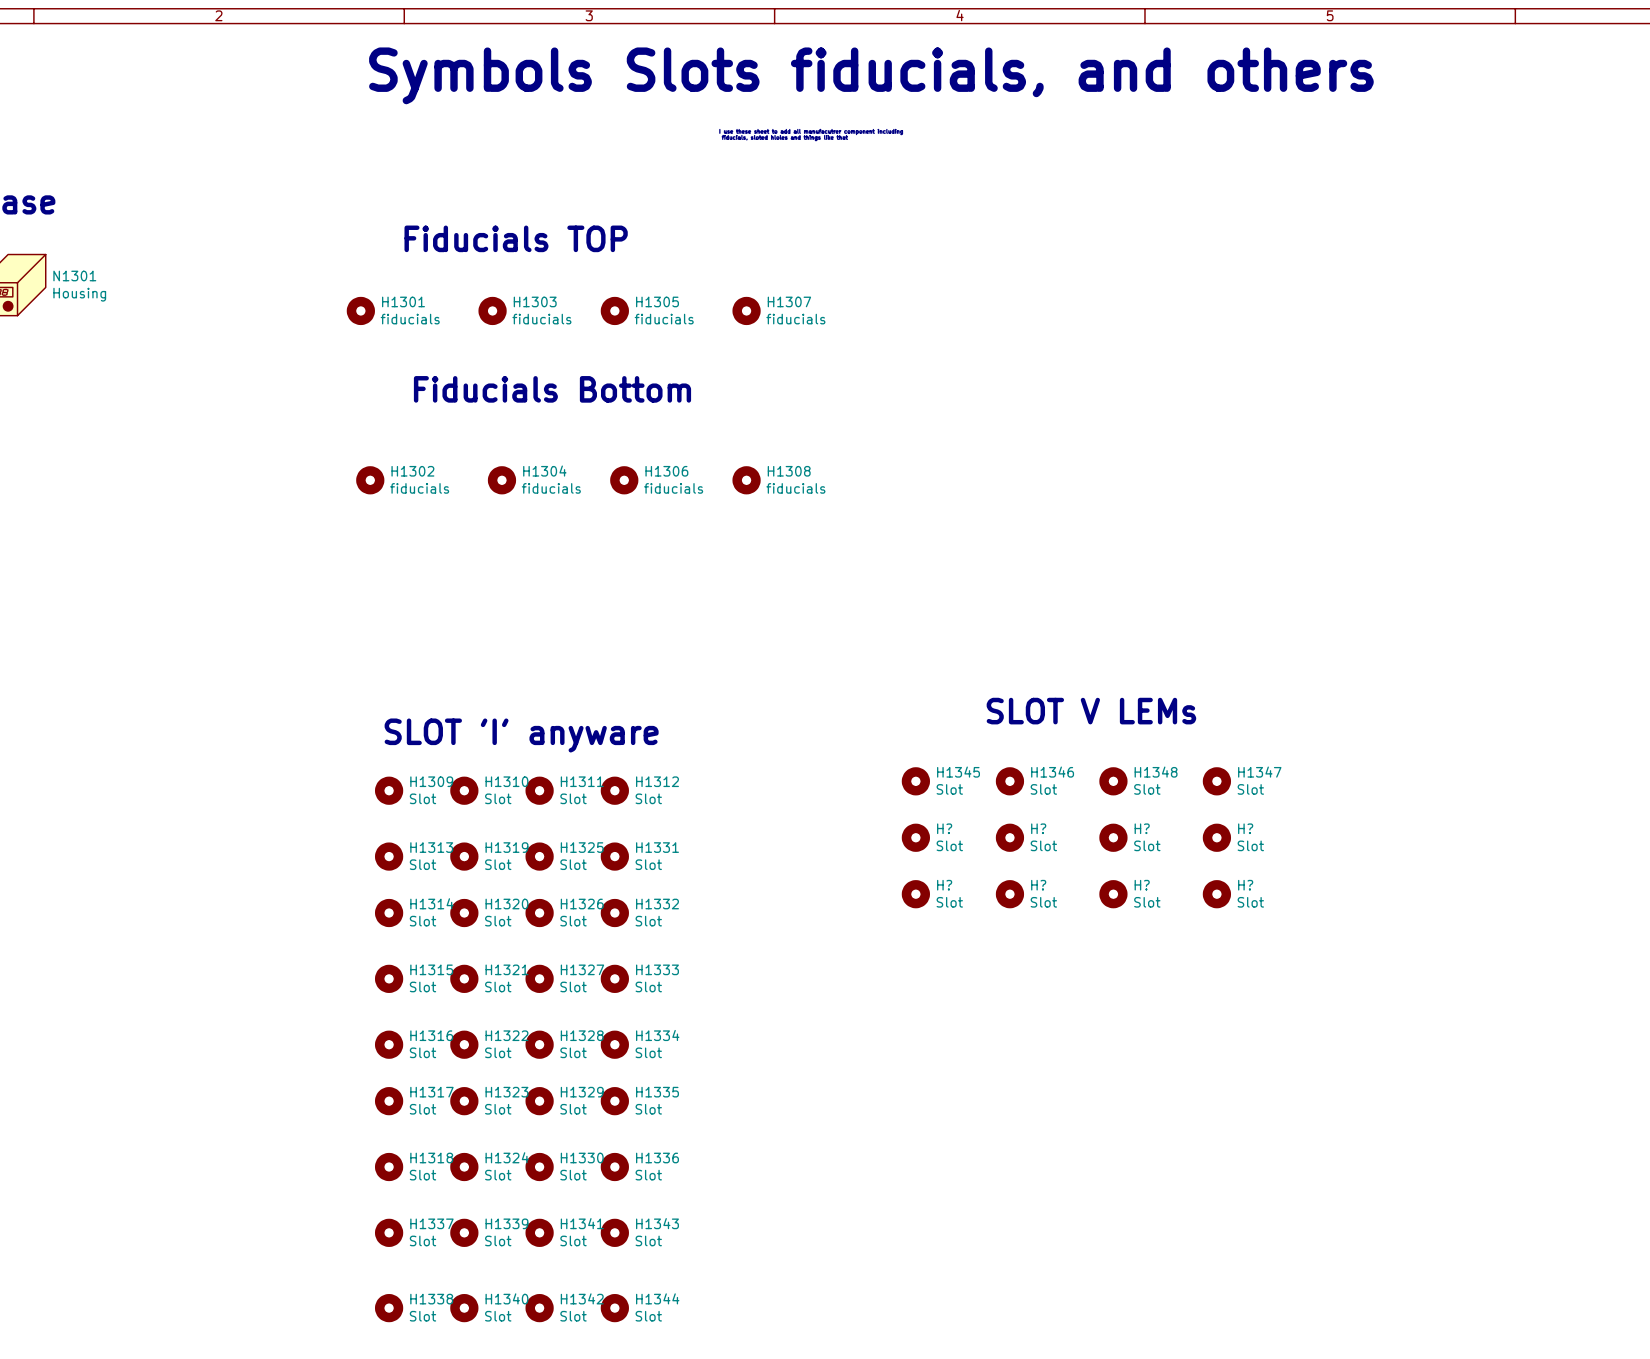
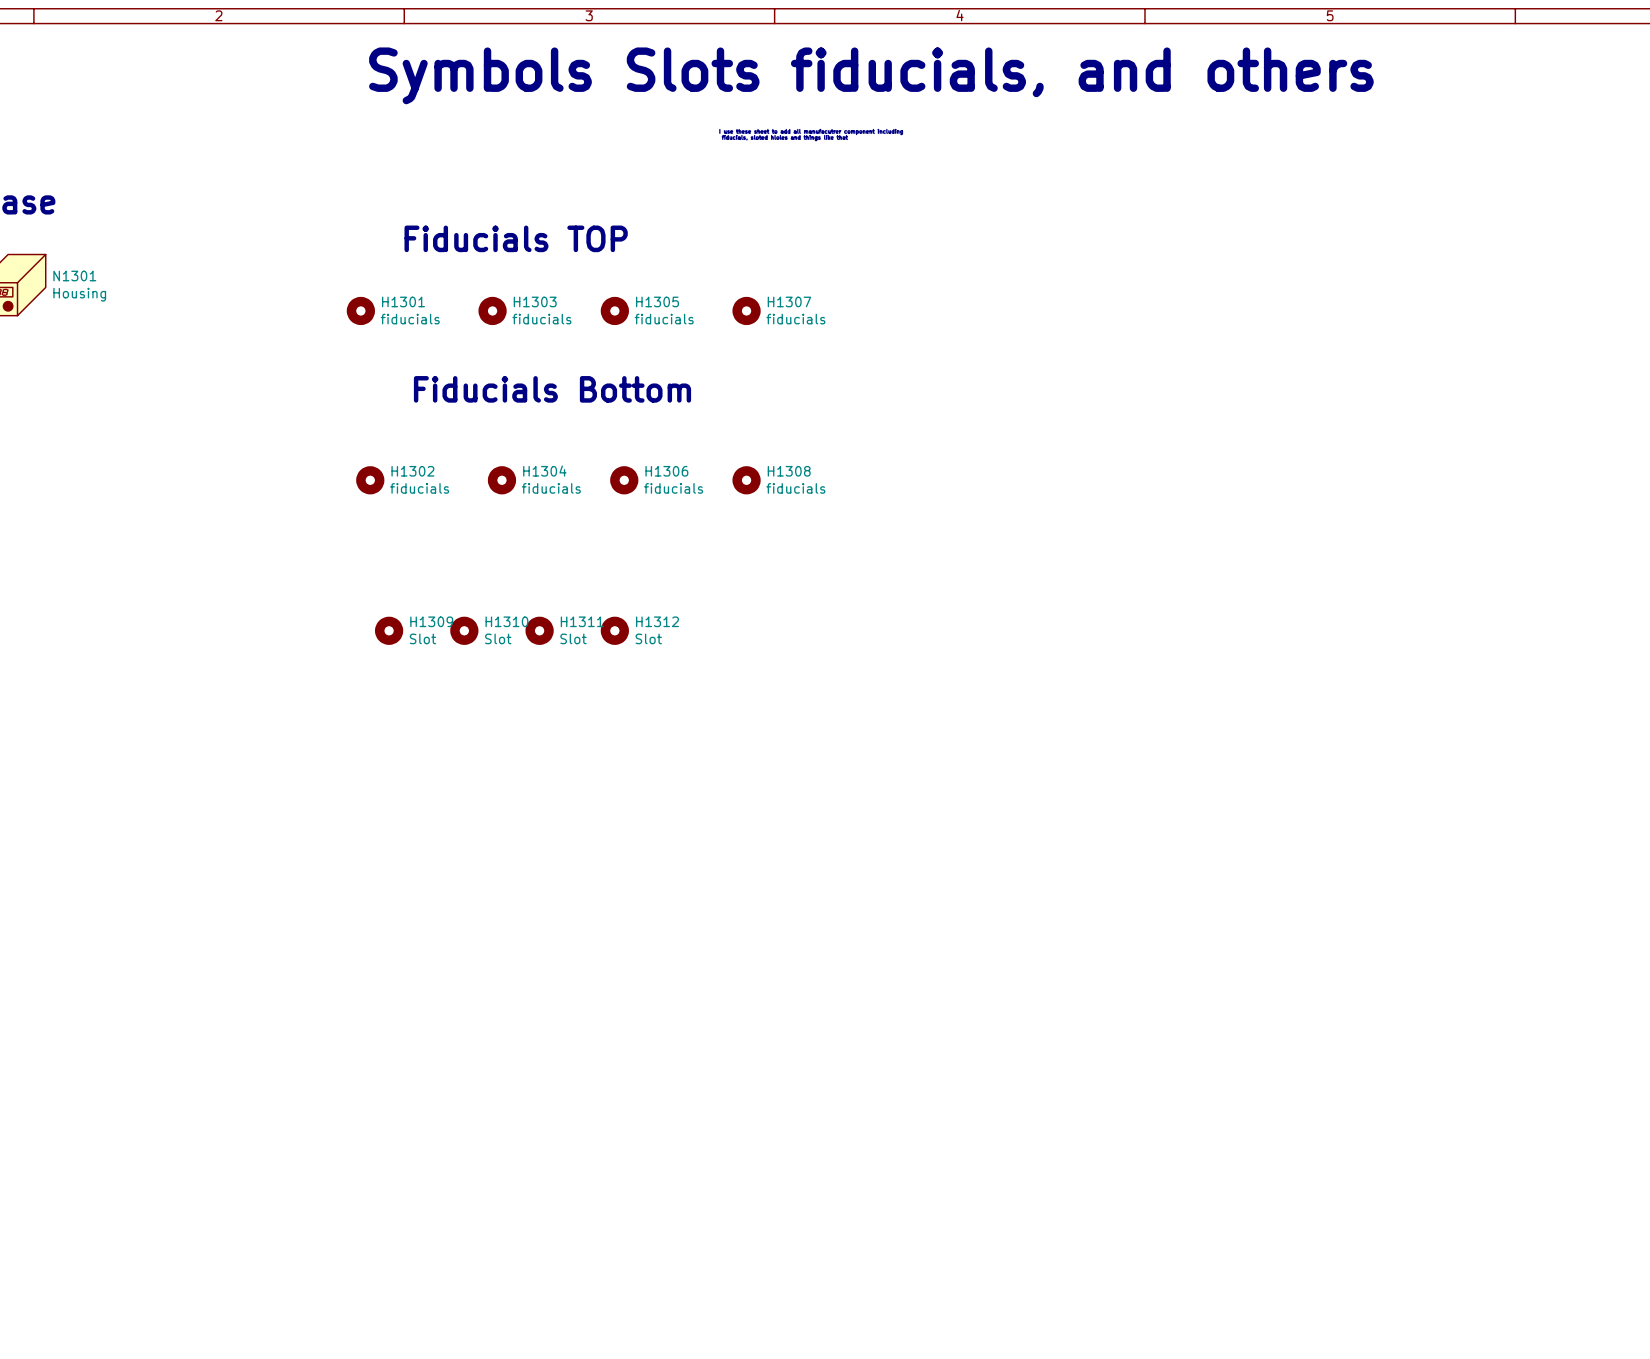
text: SLOT V LEMs (1091, 711) -> none
text: SLOT 'I' anyware (521, 735) -> none
H1345: Slot (915, 781) -> none
H1346: Slot (1009, 781) -> none
H1348: Slot (1113, 781) -> none
H1347: Slot (1216, 781) -> none
H1309 position: (389, 790) -> (389, 630)
H1310 position: (464, 790) -> (464, 630)
H1311 position: (539, 790) -> (539, 630)
H1312 position: (614, 790) -> (614, 630)
H?: Slot (915, 837) -> none
H?: Slot (1009, 837) -> none
H?: Slot (1113, 837) -> none
H?: Slot (1216, 837) -> none
H1313: Slot (389, 856) -> none
H1319: Slot (464, 856) -> none
H1325: Slot (539, 856) -> none
H1331: Slot (614, 856) -> none
H?: Slot (915, 894) -> none
H?: Slot (1009, 894) -> none
H?: Slot (1113, 894) -> none
H?: Slot (1216, 894) -> none
H1314: Slot (389, 913) -> none
H1320: Slot (464, 913) -> none
H1326: Slot (539, 913) -> none
H1332: Slot (614, 913) -> none
H1315: Slot (389, 978) -> none
H1321: Slot (464, 978) -> none
H1327: Slot (539, 978) -> none
H1333: Slot (614, 978) -> none
H1316: Slot (389, 1044) -> none
H1322: Slot (464, 1044) -> none
H1328: Slot (539, 1044) -> none
H1334: Slot (614, 1044) -> none
H1317: Slot (389, 1101) -> none
H1323: Slot (464, 1101) -> none
H1329: Slot (539, 1101) -> none
H1335: Slot (614, 1101) -> none
H1318: Slot (389, 1167) -> none
H1324: Slot (464, 1167) -> none
H1330: Slot (539, 1167) -> none
H1336: Slot (614, 1167) -> none
H1337: Slot (389, 1232) -> none
H1339: Slot (464, 1232) -> none
H1341: Slot (539, 1232) -> none
H1343: Slot (614, 1232) -> none
H1338: Slot (389, 1308) -> none
H1340: Slot (464, 1308) -> none
H1342: Slot (539, 1308) -> none
H1344: Slot (614, 1308) -> none

